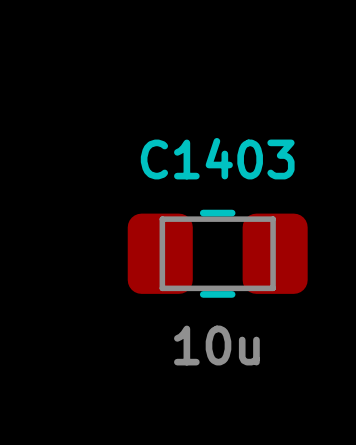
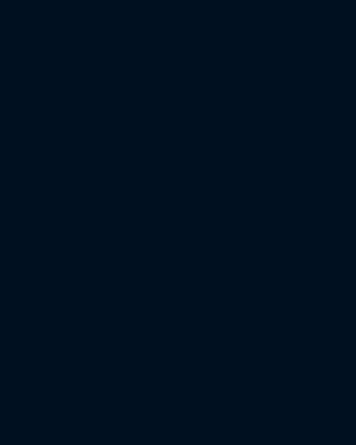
C1403: 10u (217, 253) -> none

